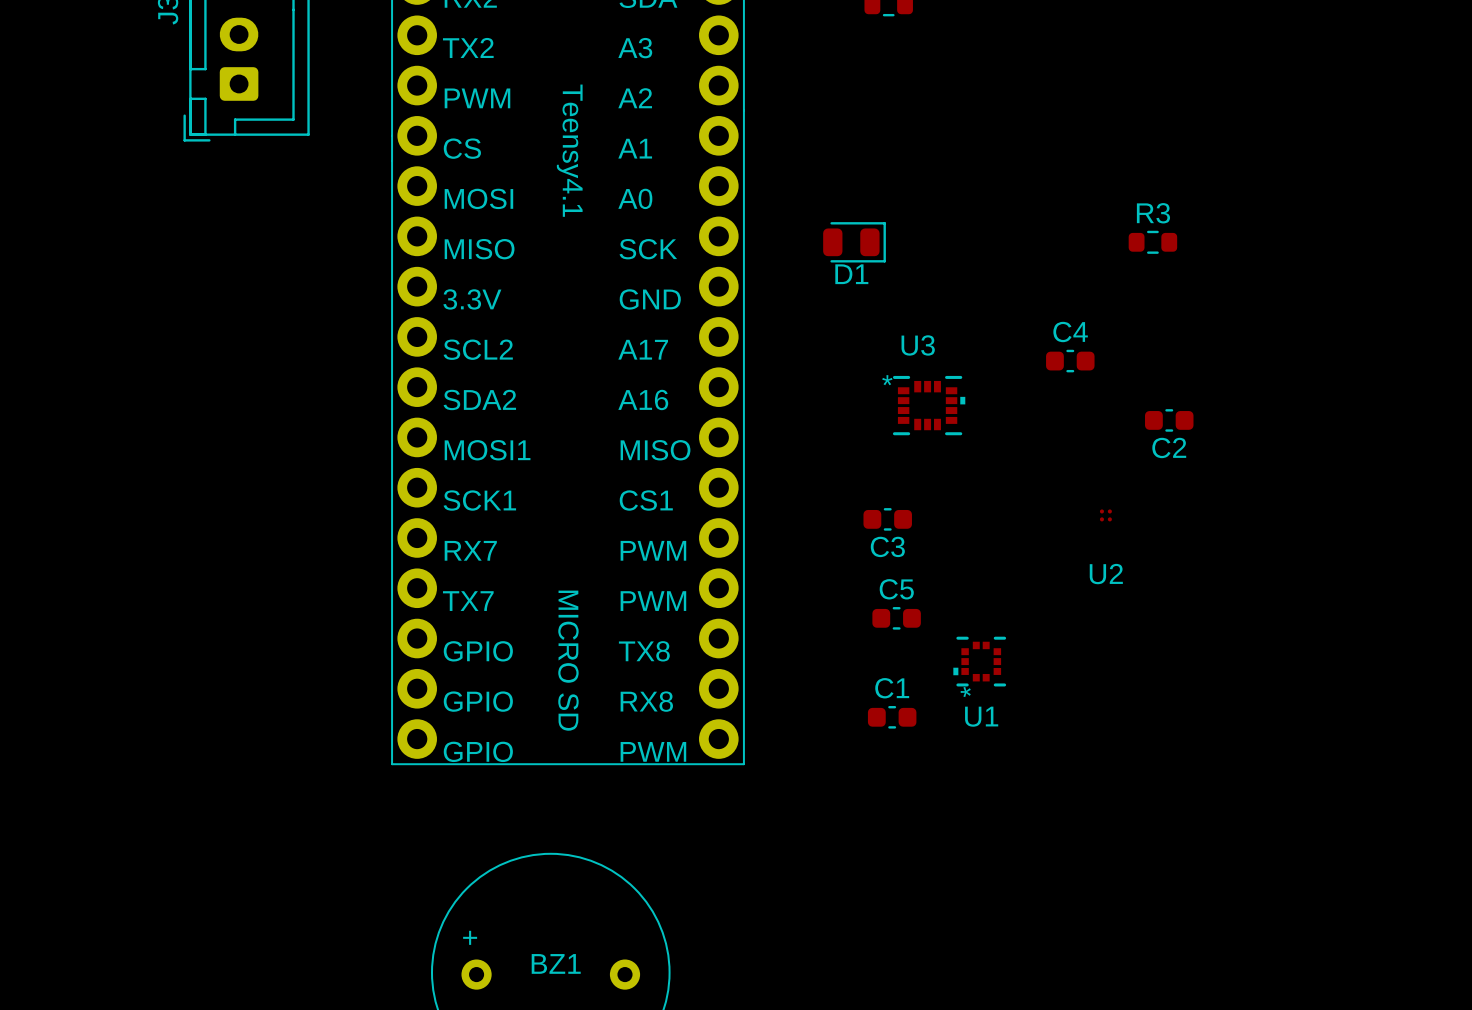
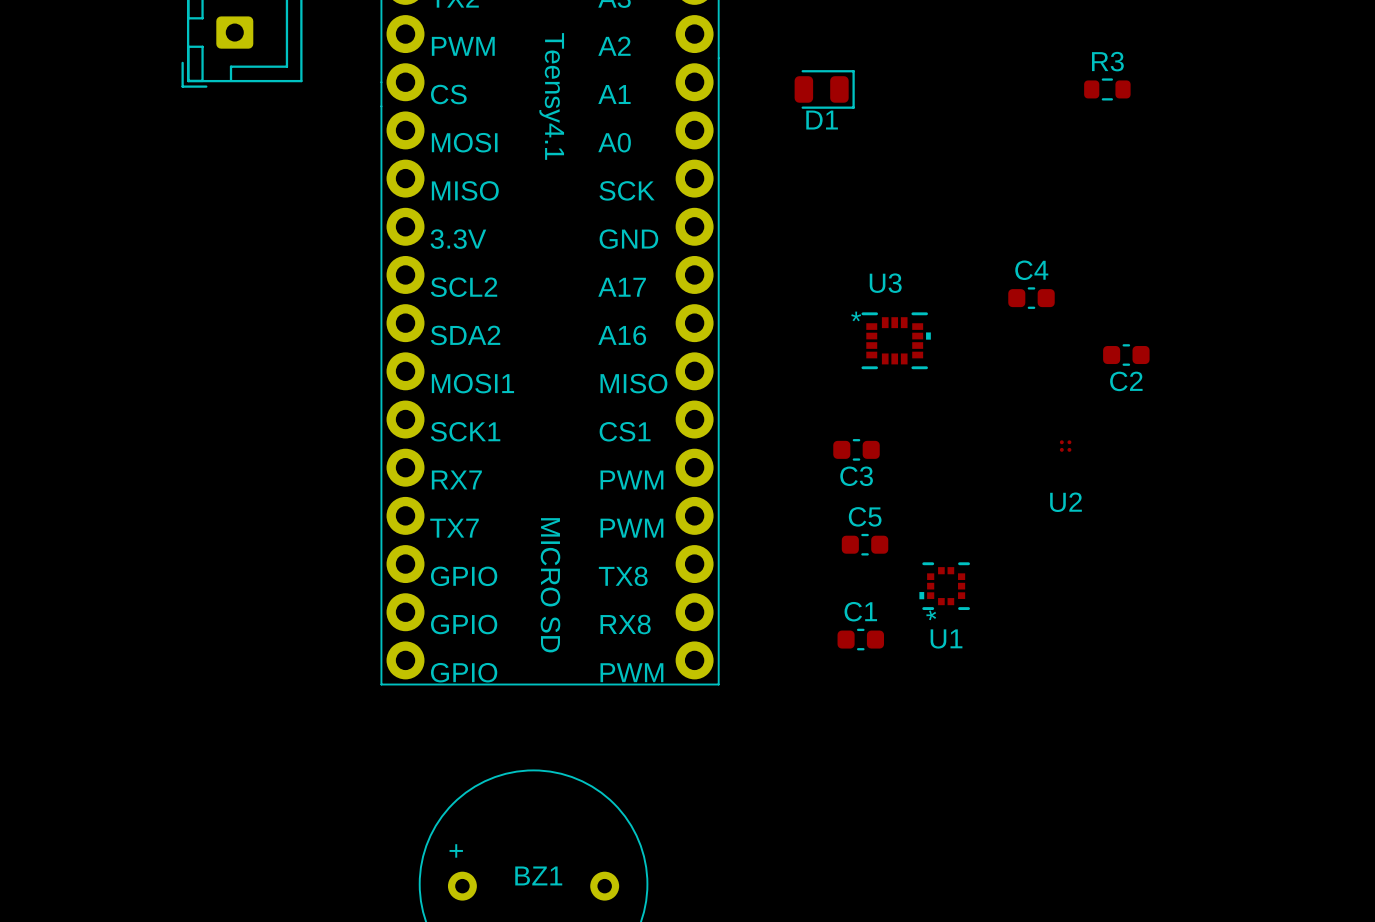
D1 position: (854, 242) -> (824, 89)
R3 position: (1152, 242) -> (1107, 89)

